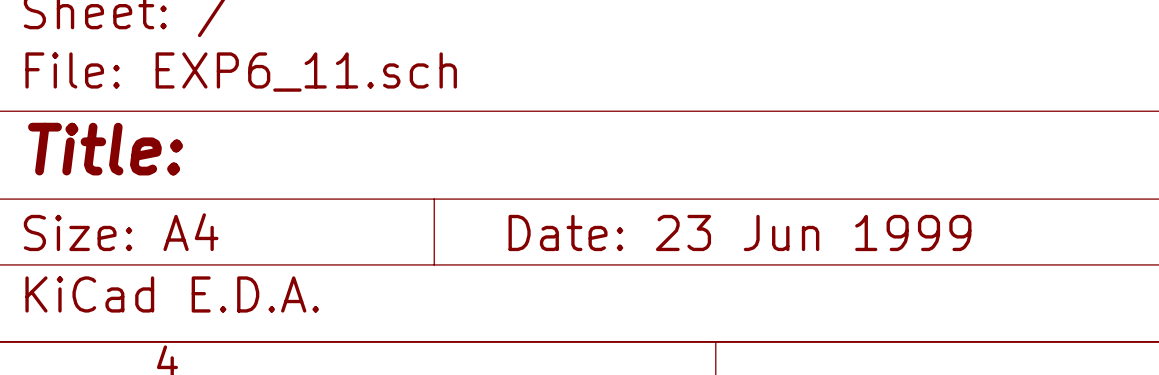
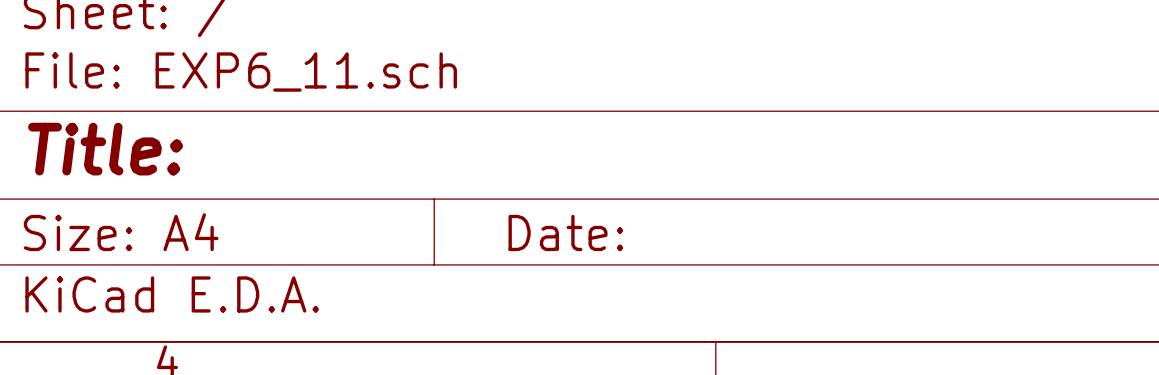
title block: Date: 23 Jun 1999 (739, 232) -> Date: (565, 232)

